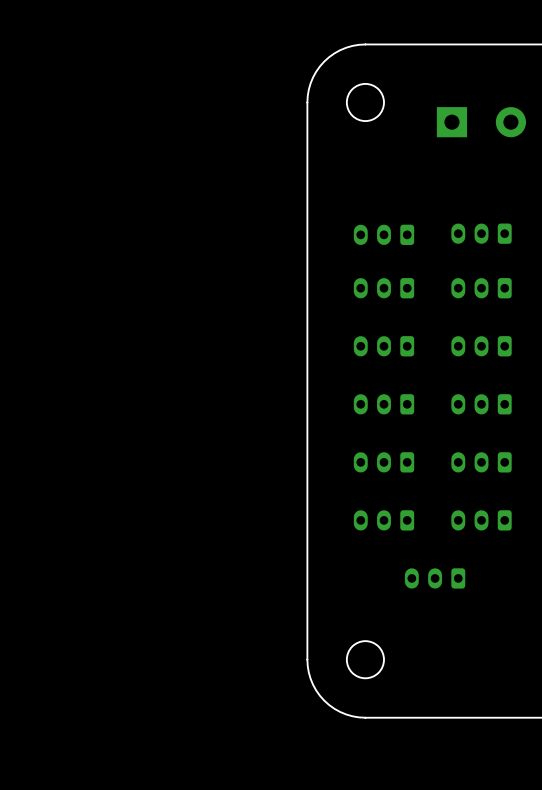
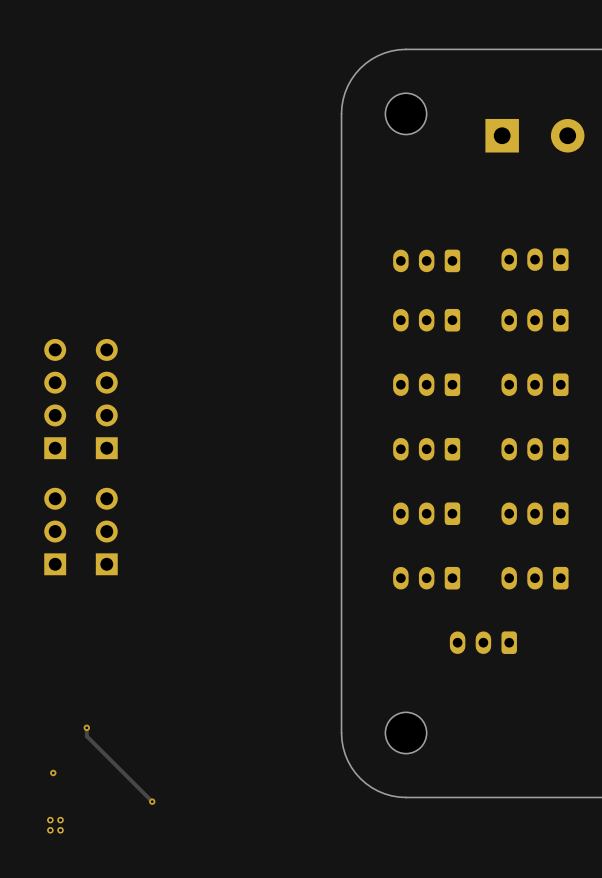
part: none -> (55, 399)
part: none -> (106, 399)
part: none -> (55, 531)
part: none -> (106, 531)
track: none -> (86, 727) (86, 736) (152, 801)
via: none -> (86, 727)
via: none -> (53, 772)
via: none -> (152, 801)
part: none -> (55, 825)

